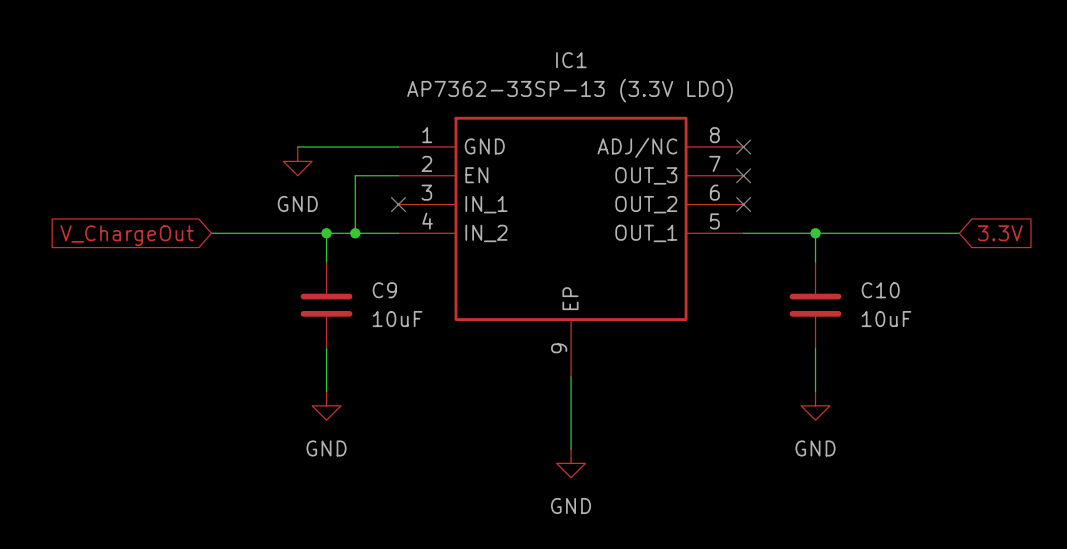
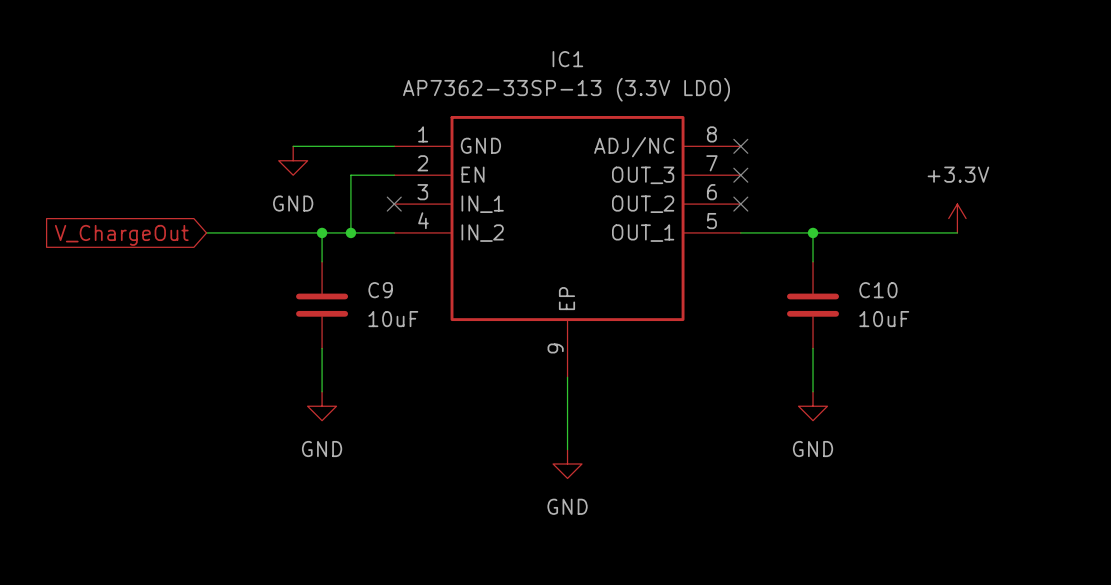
power symbol: none -> +3.3V (957, 218)
global label: 3.3V (1000, 233) -> none

